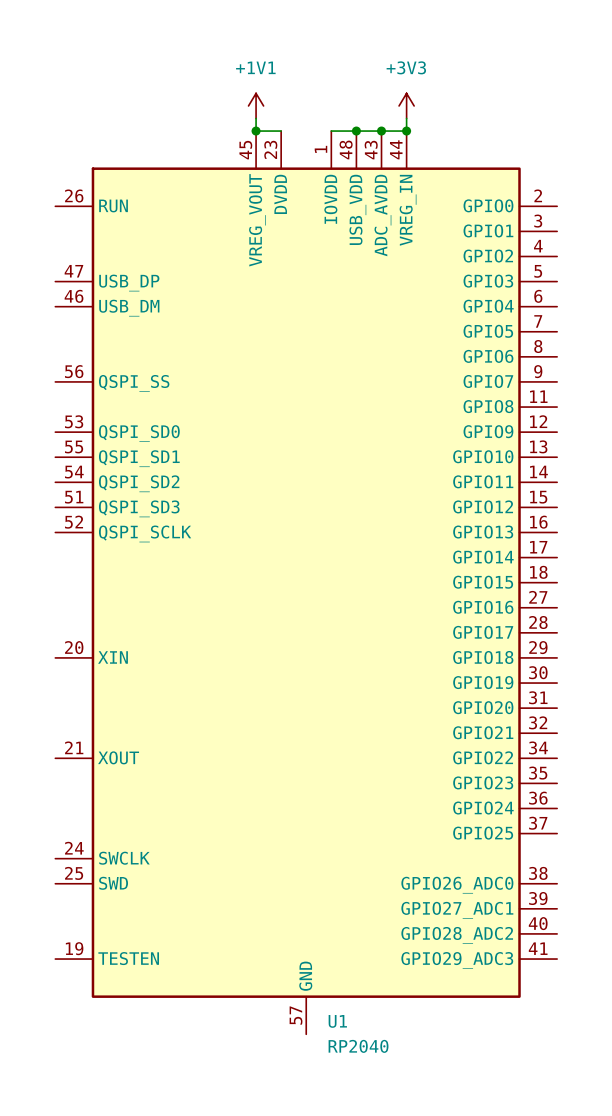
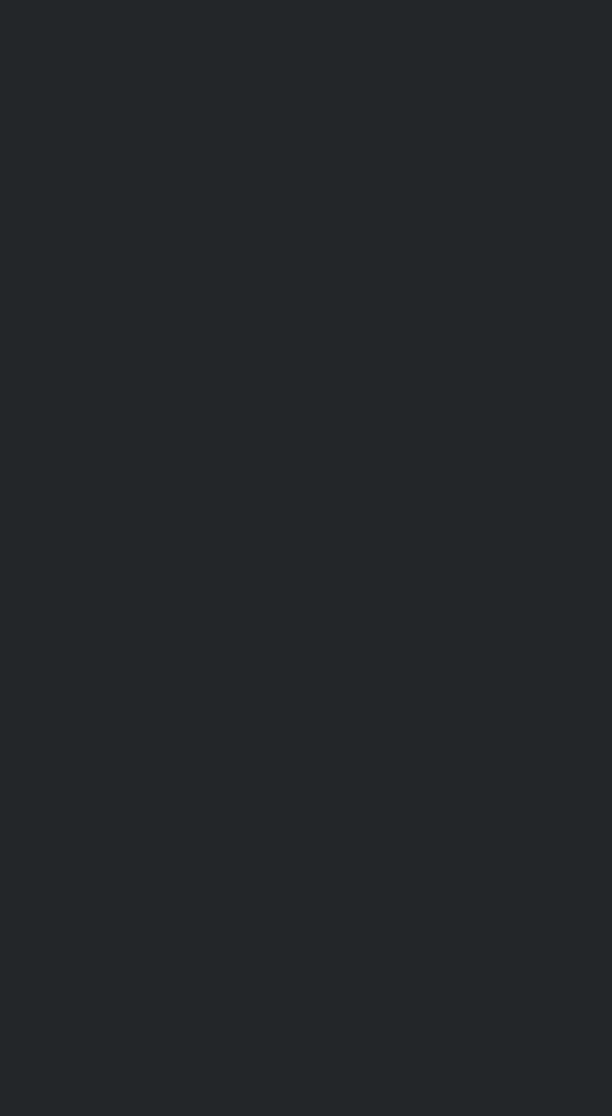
power symbol: +1V1 (256, 105) -> none
power symbol: +3V3 (406, 105) -> none
wire: (256, 118) (256, 131) (281, 131) -> none
wire: (406, 118) (406, 131) (331, 131) -> none
junction: (256, 131) -> none
junction: (356, 131) -> none
junction: (381, 131) -> none
junction: (406, 131) -> none
U1: RP2040 (306, 582) -> none

